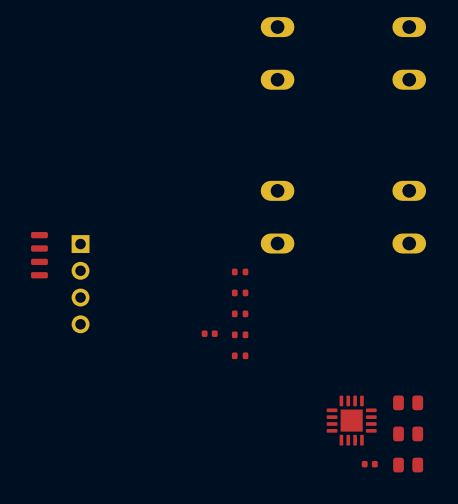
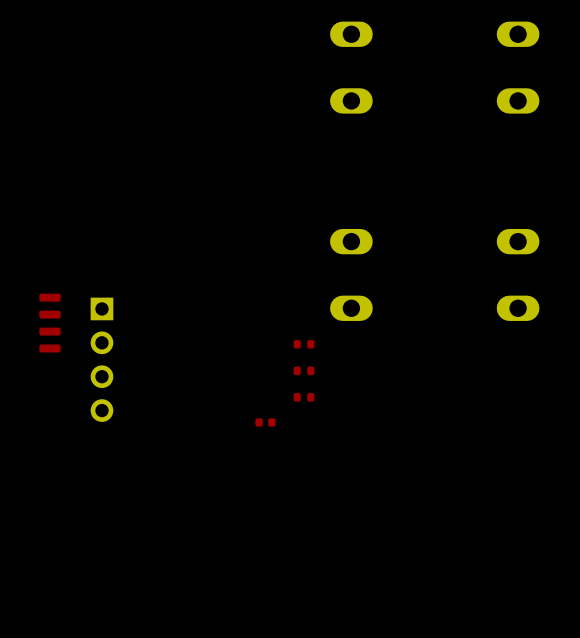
part: (240, 334) -> none
part: (240, 355) -> none
part: (408, 402) -> none
part: (351, 420) -> none
part: (408, 433) -> none
part: (369, 464) -> none
part: (408, 465) -> none

